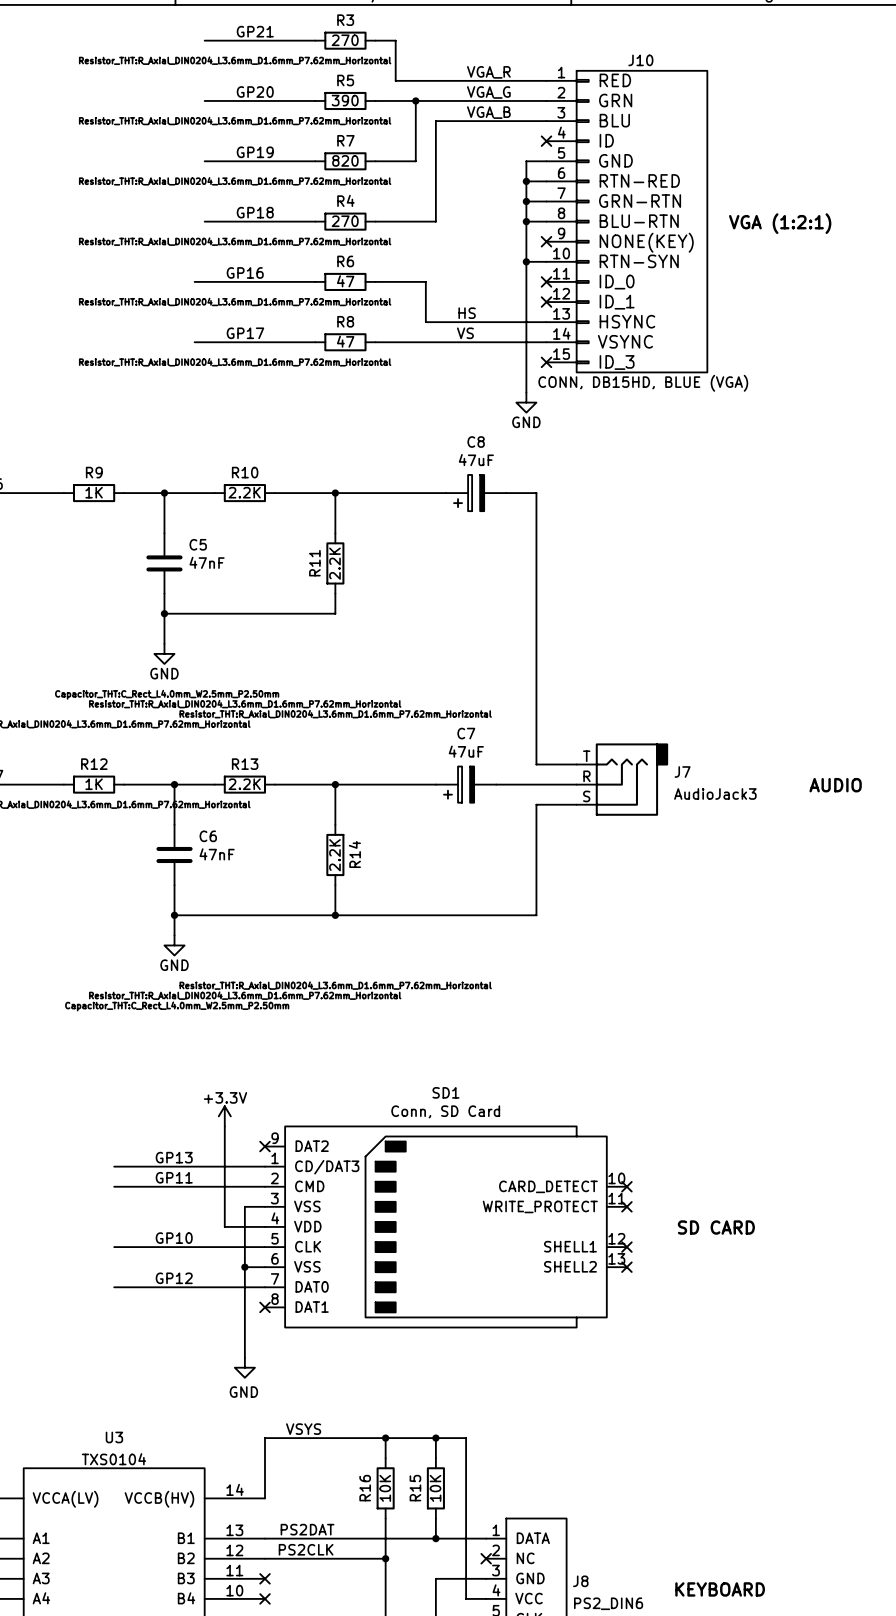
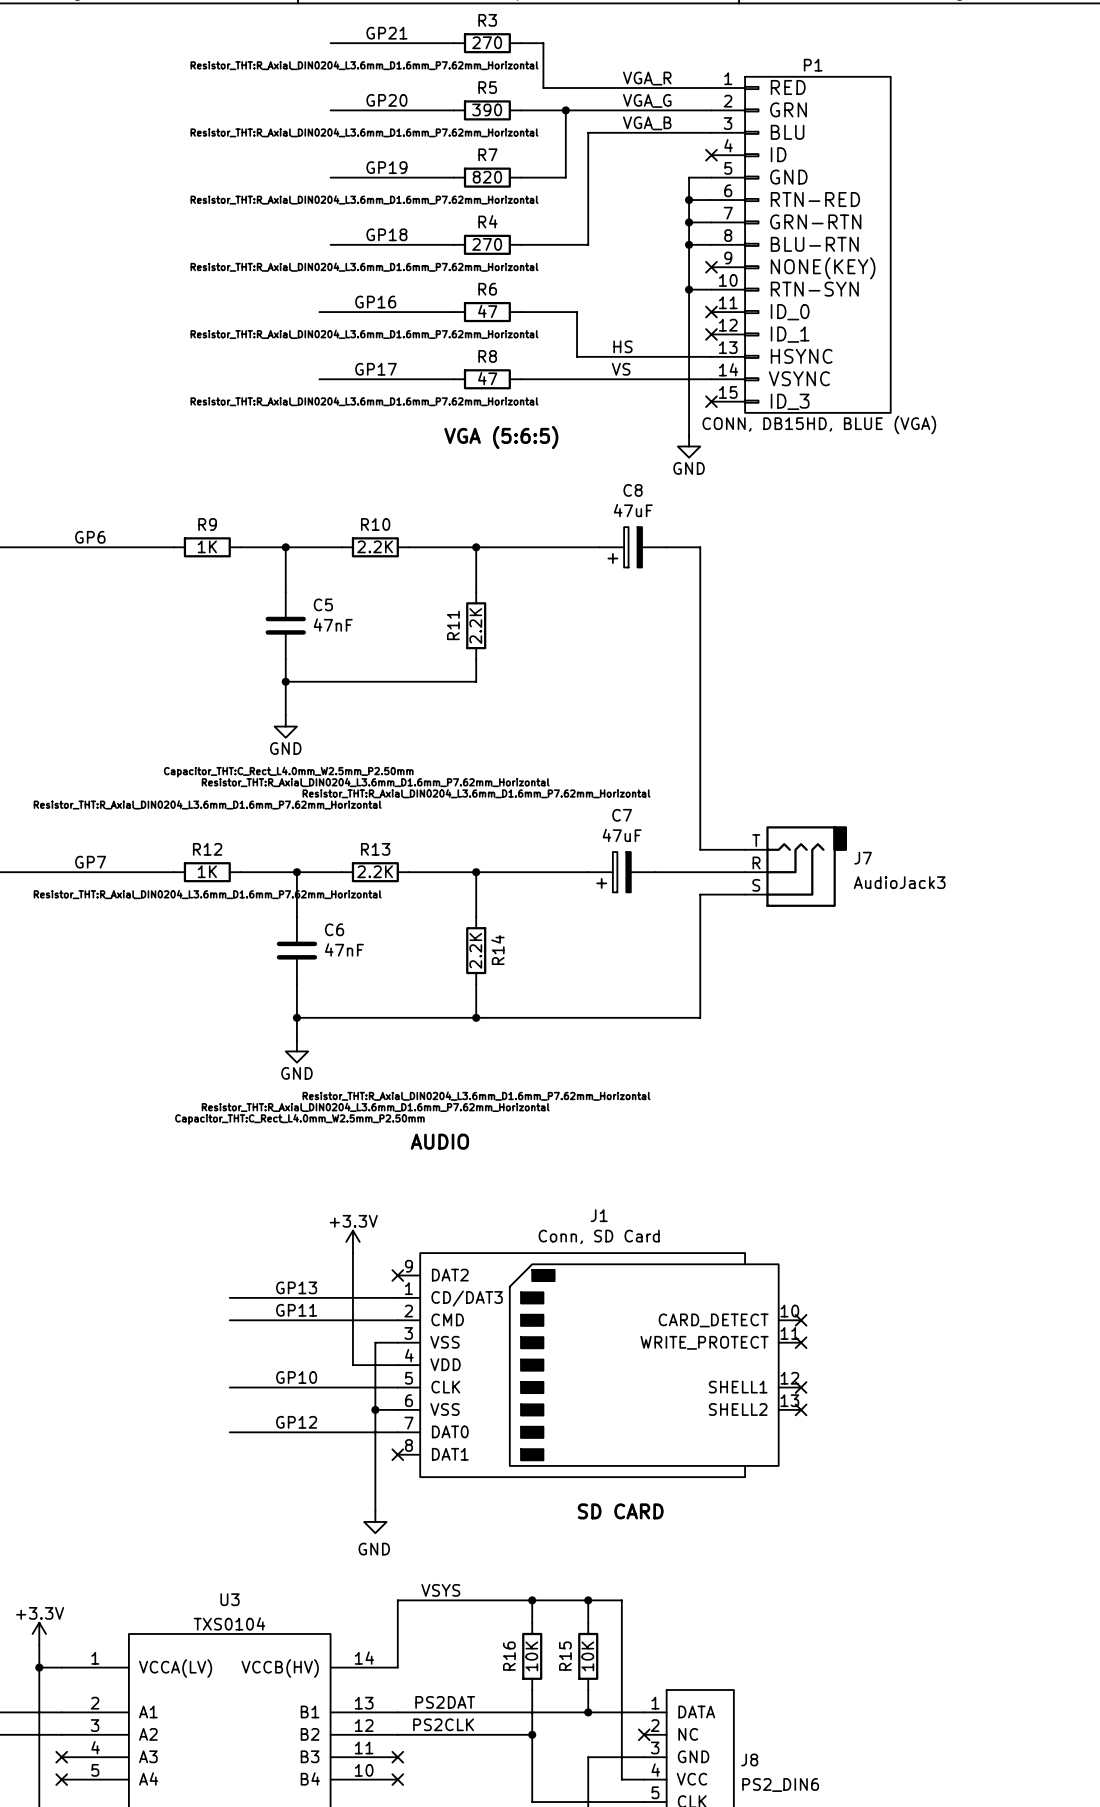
J10 name: J10 (640, 60) -> P1 (813, 65)
text: VGA (1:2:1) (780, 223) -> none
text: none -> VGA (5:6:5) (501, 437)
text: AUDIO (835, 785) -> none
text: none -> AUDIO (439, 1141)
SD1 name: SD1 (445, 1092) -> J1 (599, 1215)
text: SD CARD (716, 1227) -> none
text: none -> SD CARD (620, 1511)
text: KEYBOARD (720, 1589) -> none

